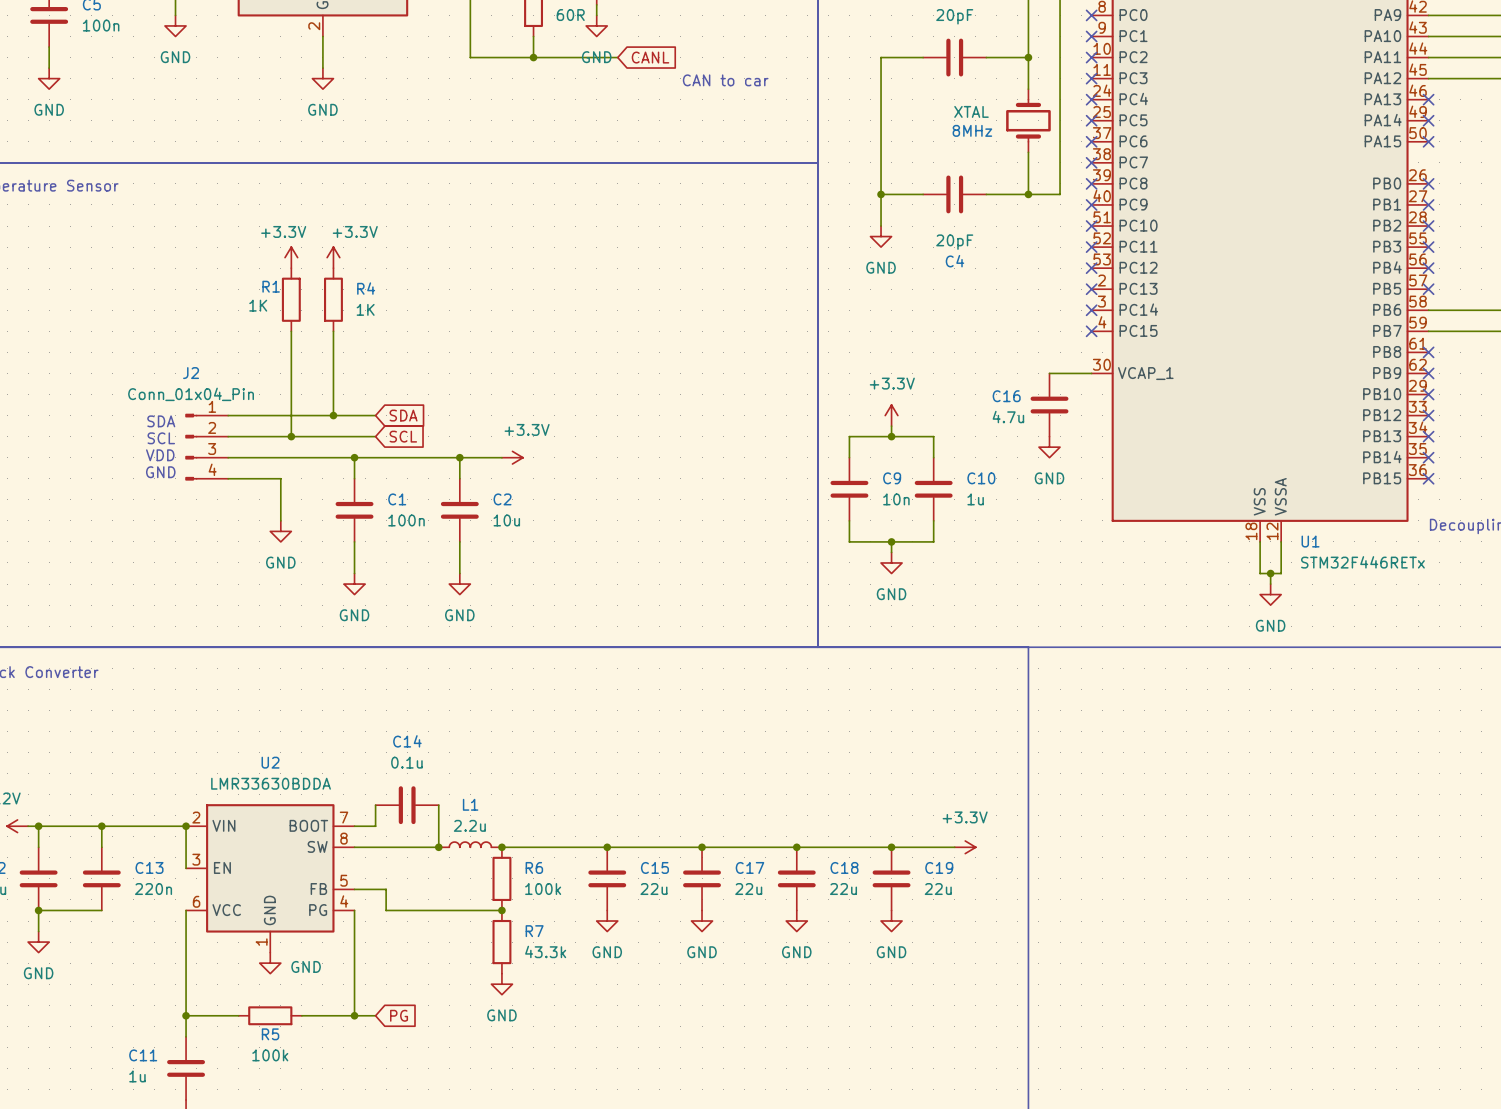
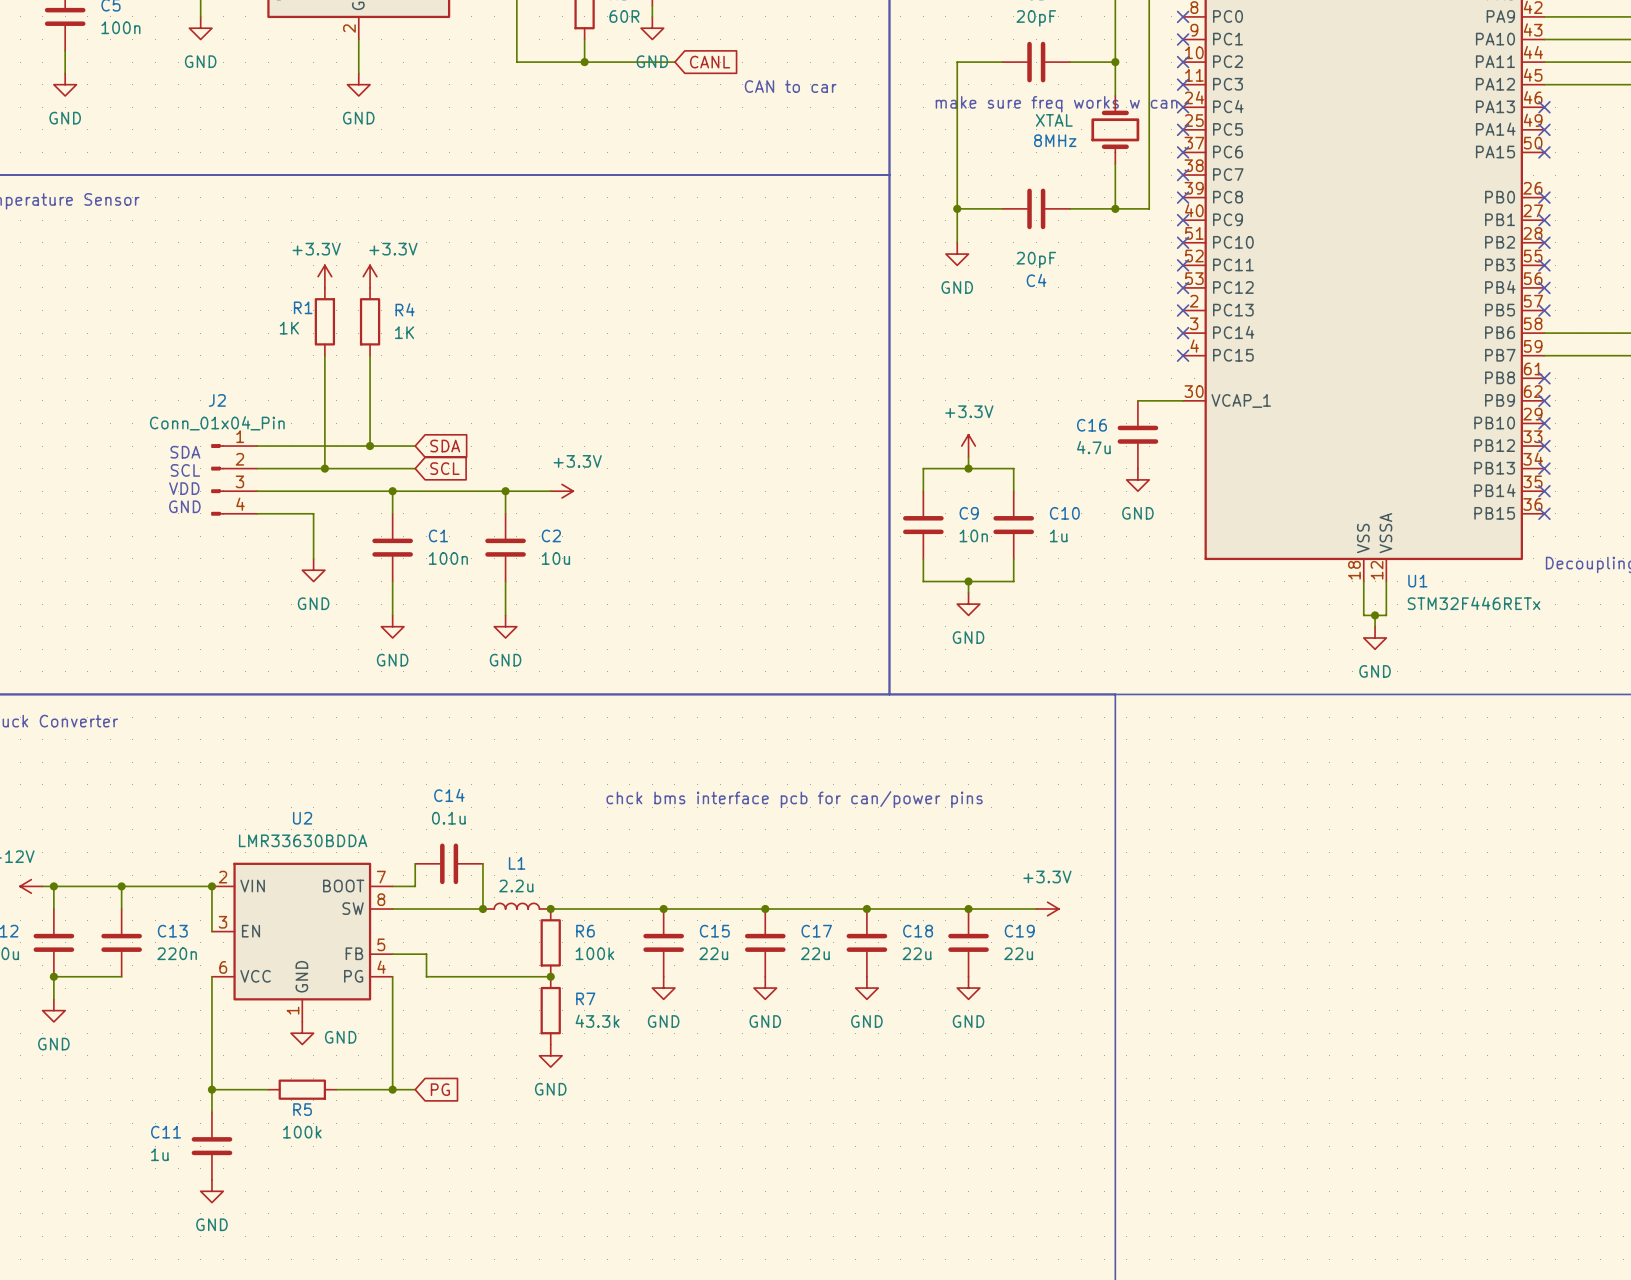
text: none -> make sure freq works w can (1056, 104)
text: none -> chck bms interface pcb for can/power pins (794, 799)

